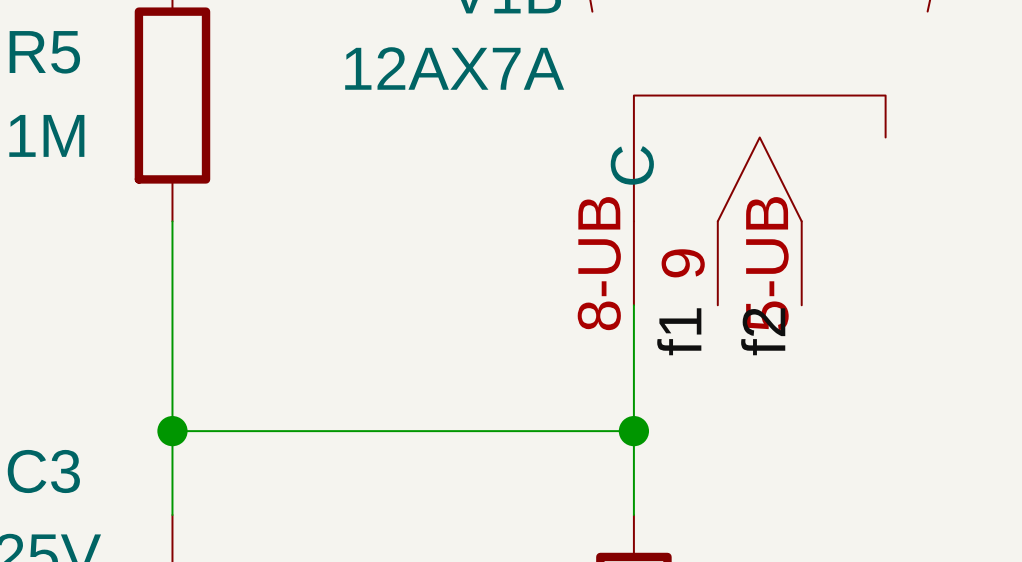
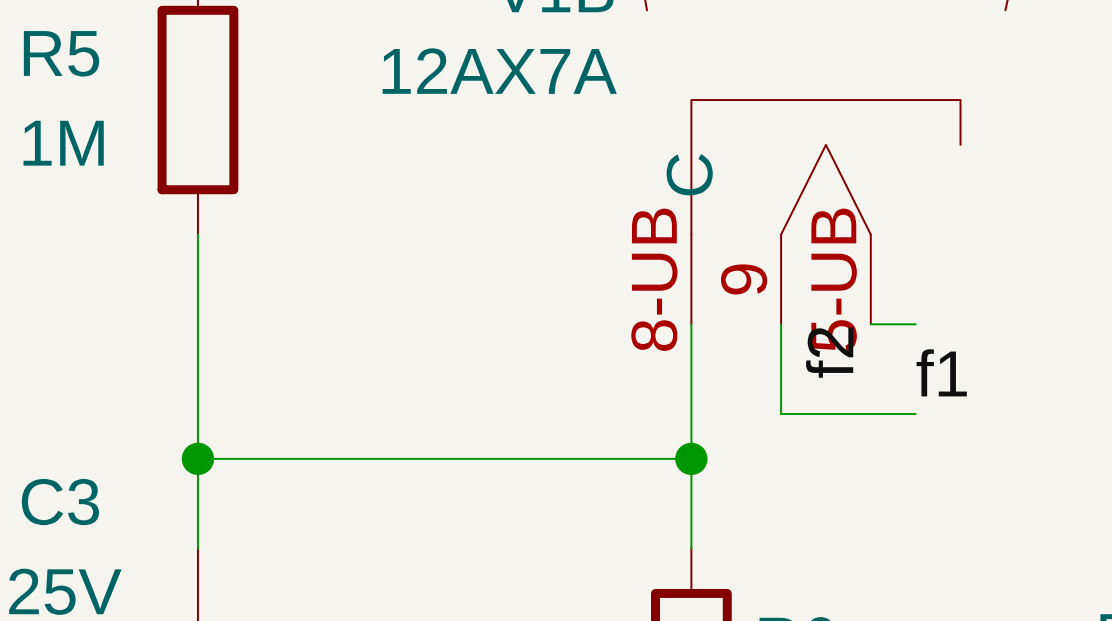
wire: none -> (781, 324) (781, 414) (915, 414)
wire: none -> (870, 324) (915, 324)
label rotation: 0° (679, 331) -> 90° clockwise (941, 372)
label position: f1 (679, 331) -> f1 (941, 372)

